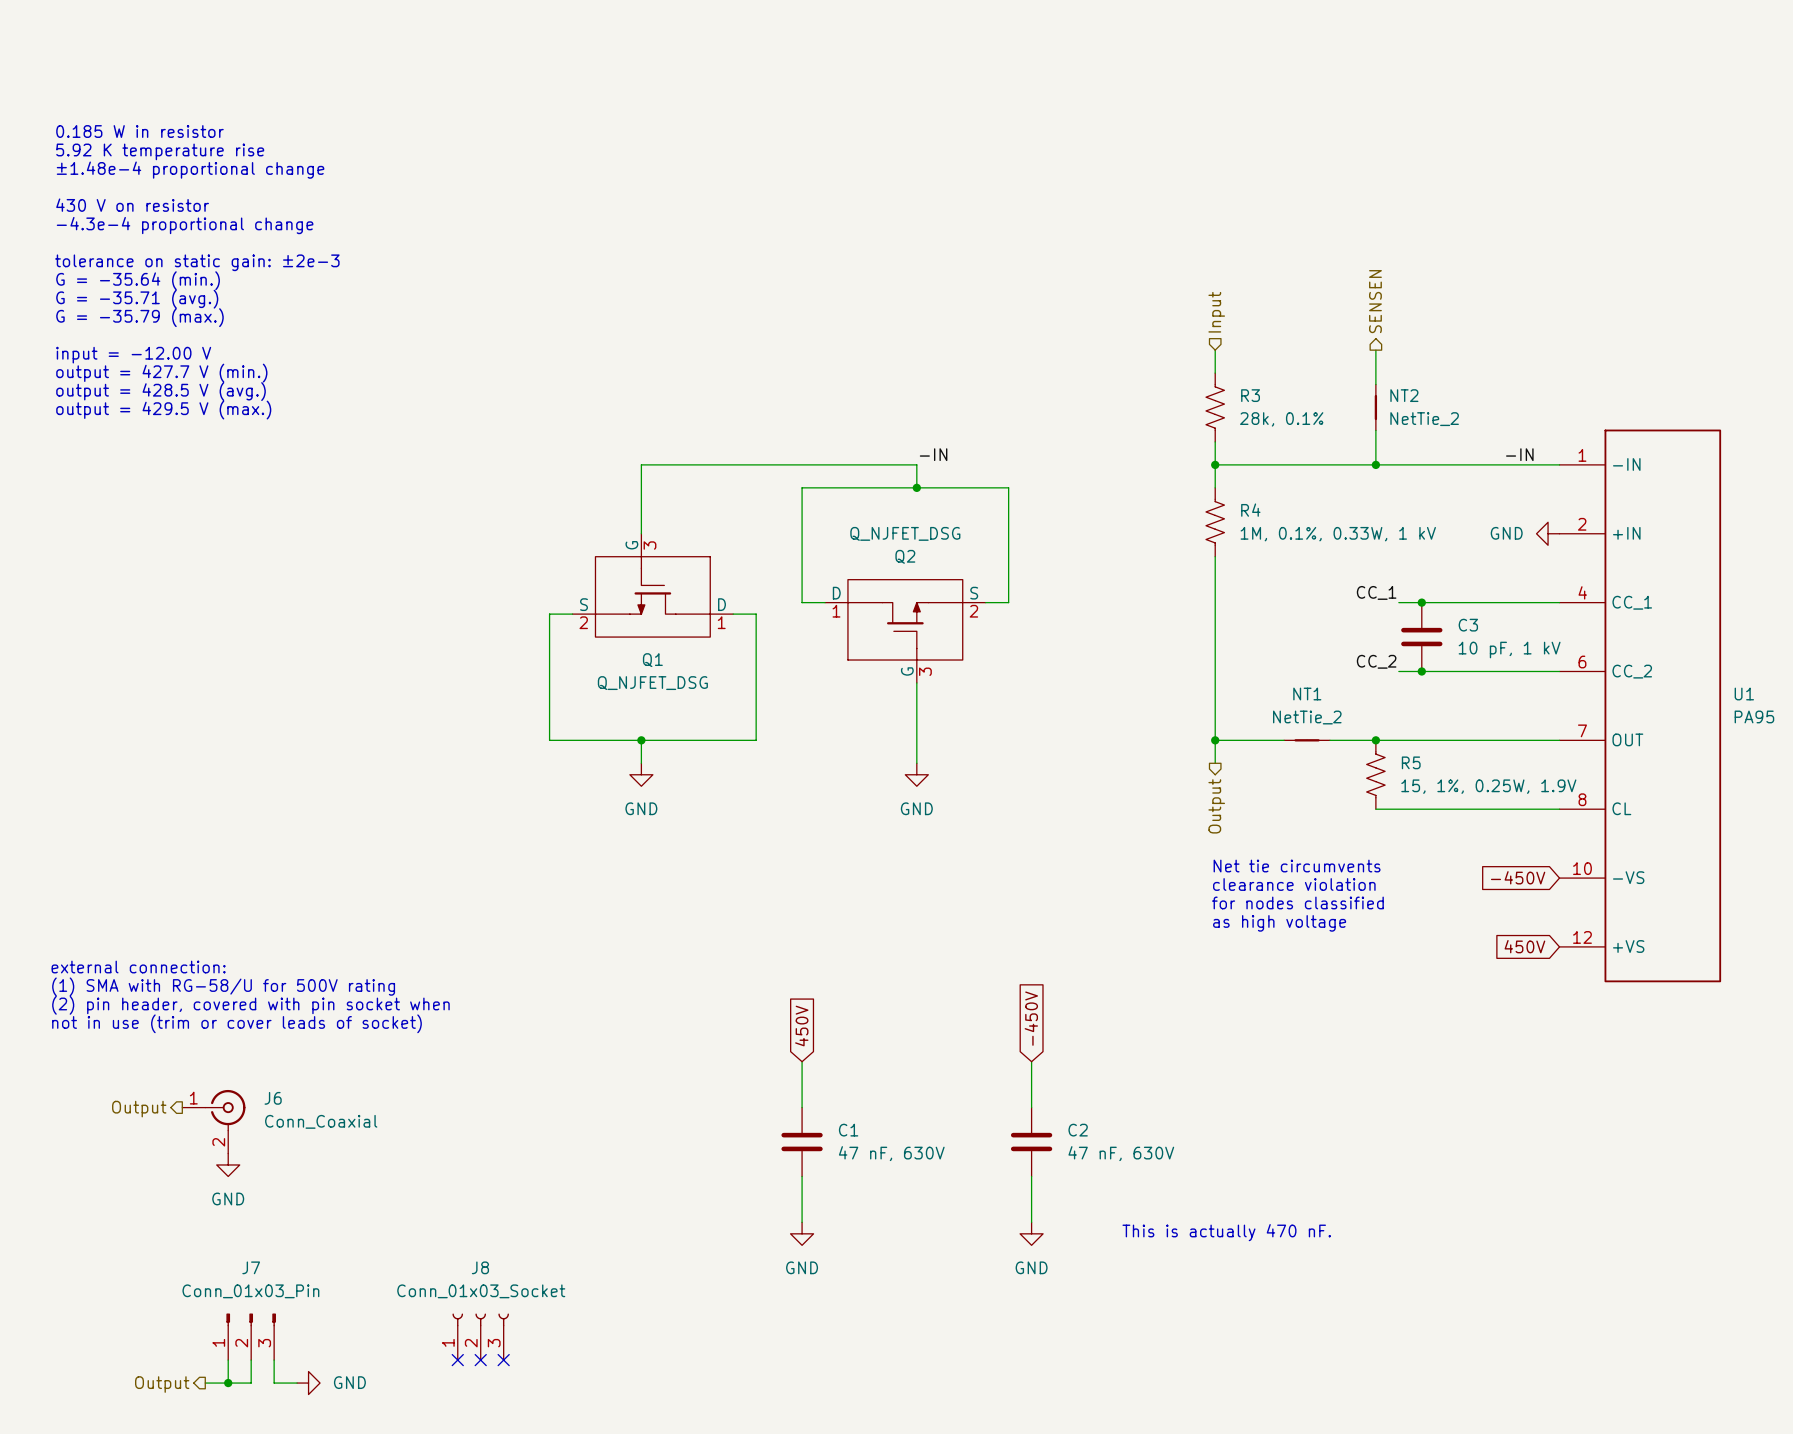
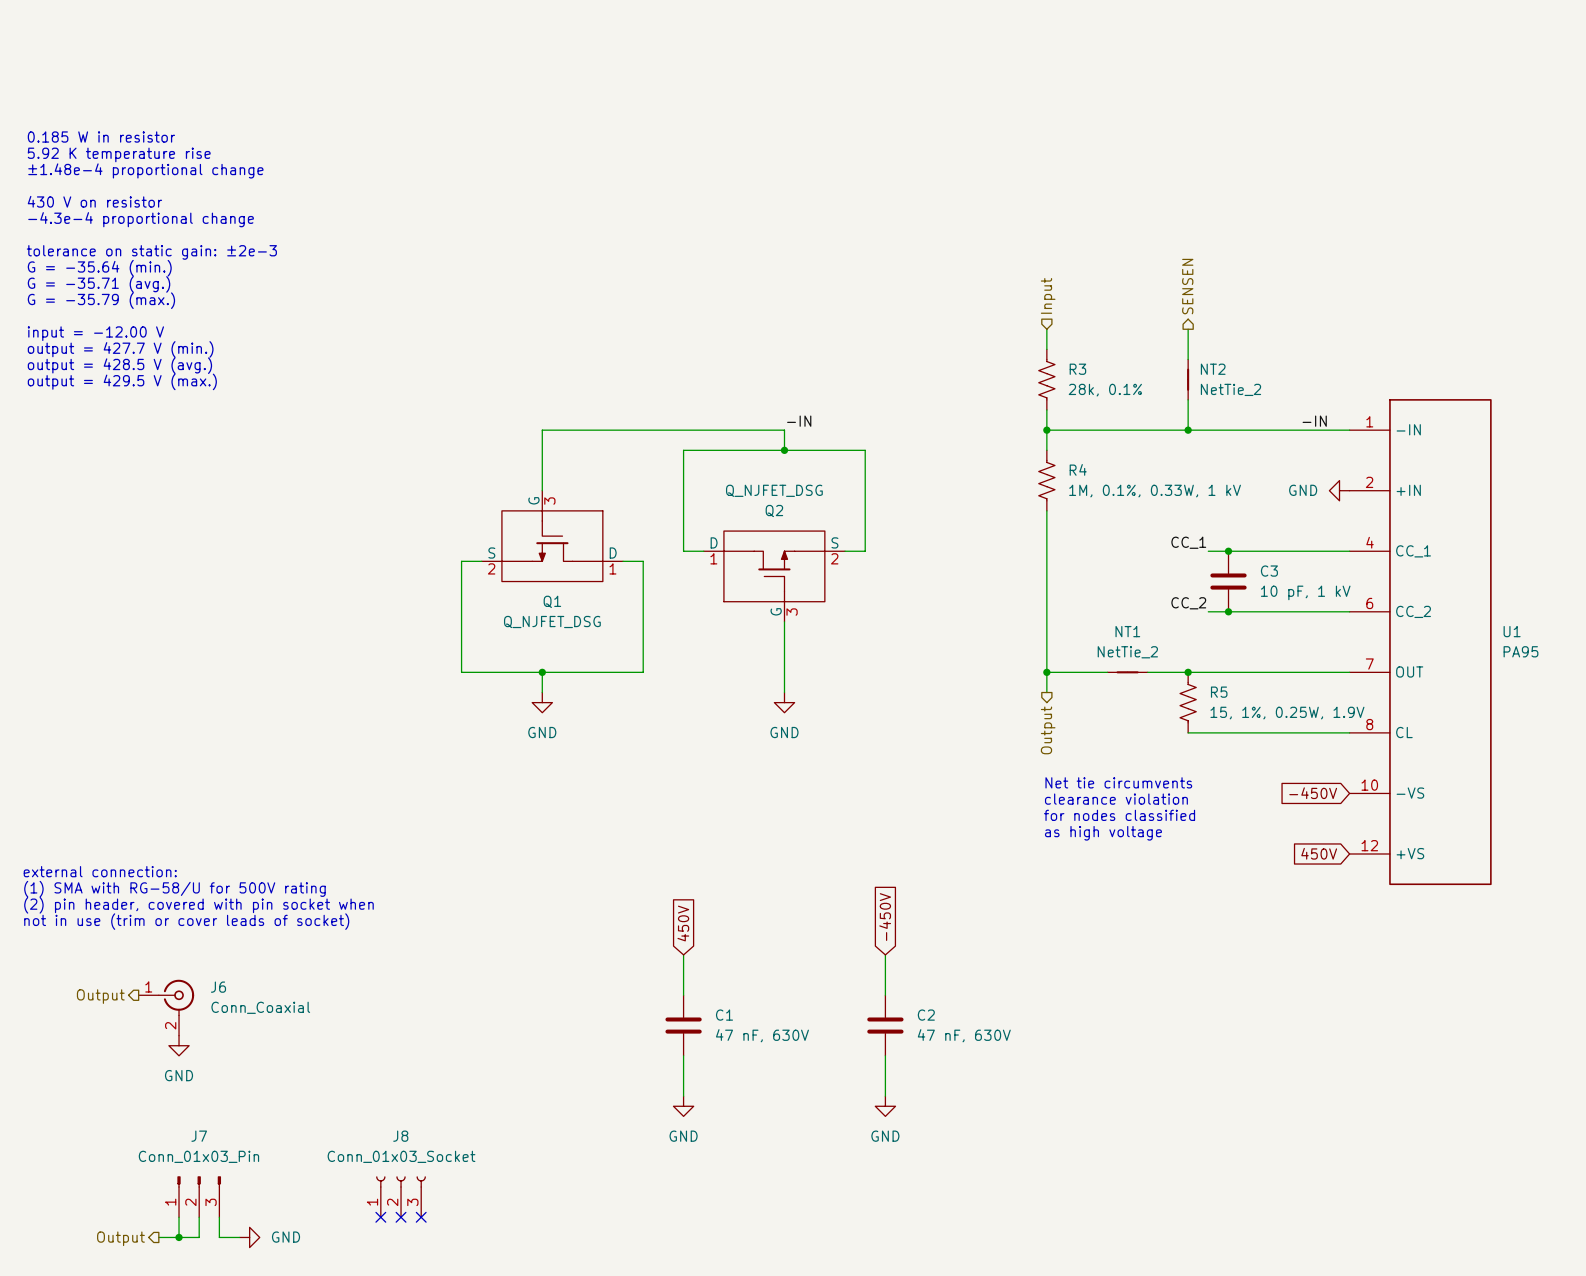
text: This is actually 470 nF. (1226, 1232) -> none

